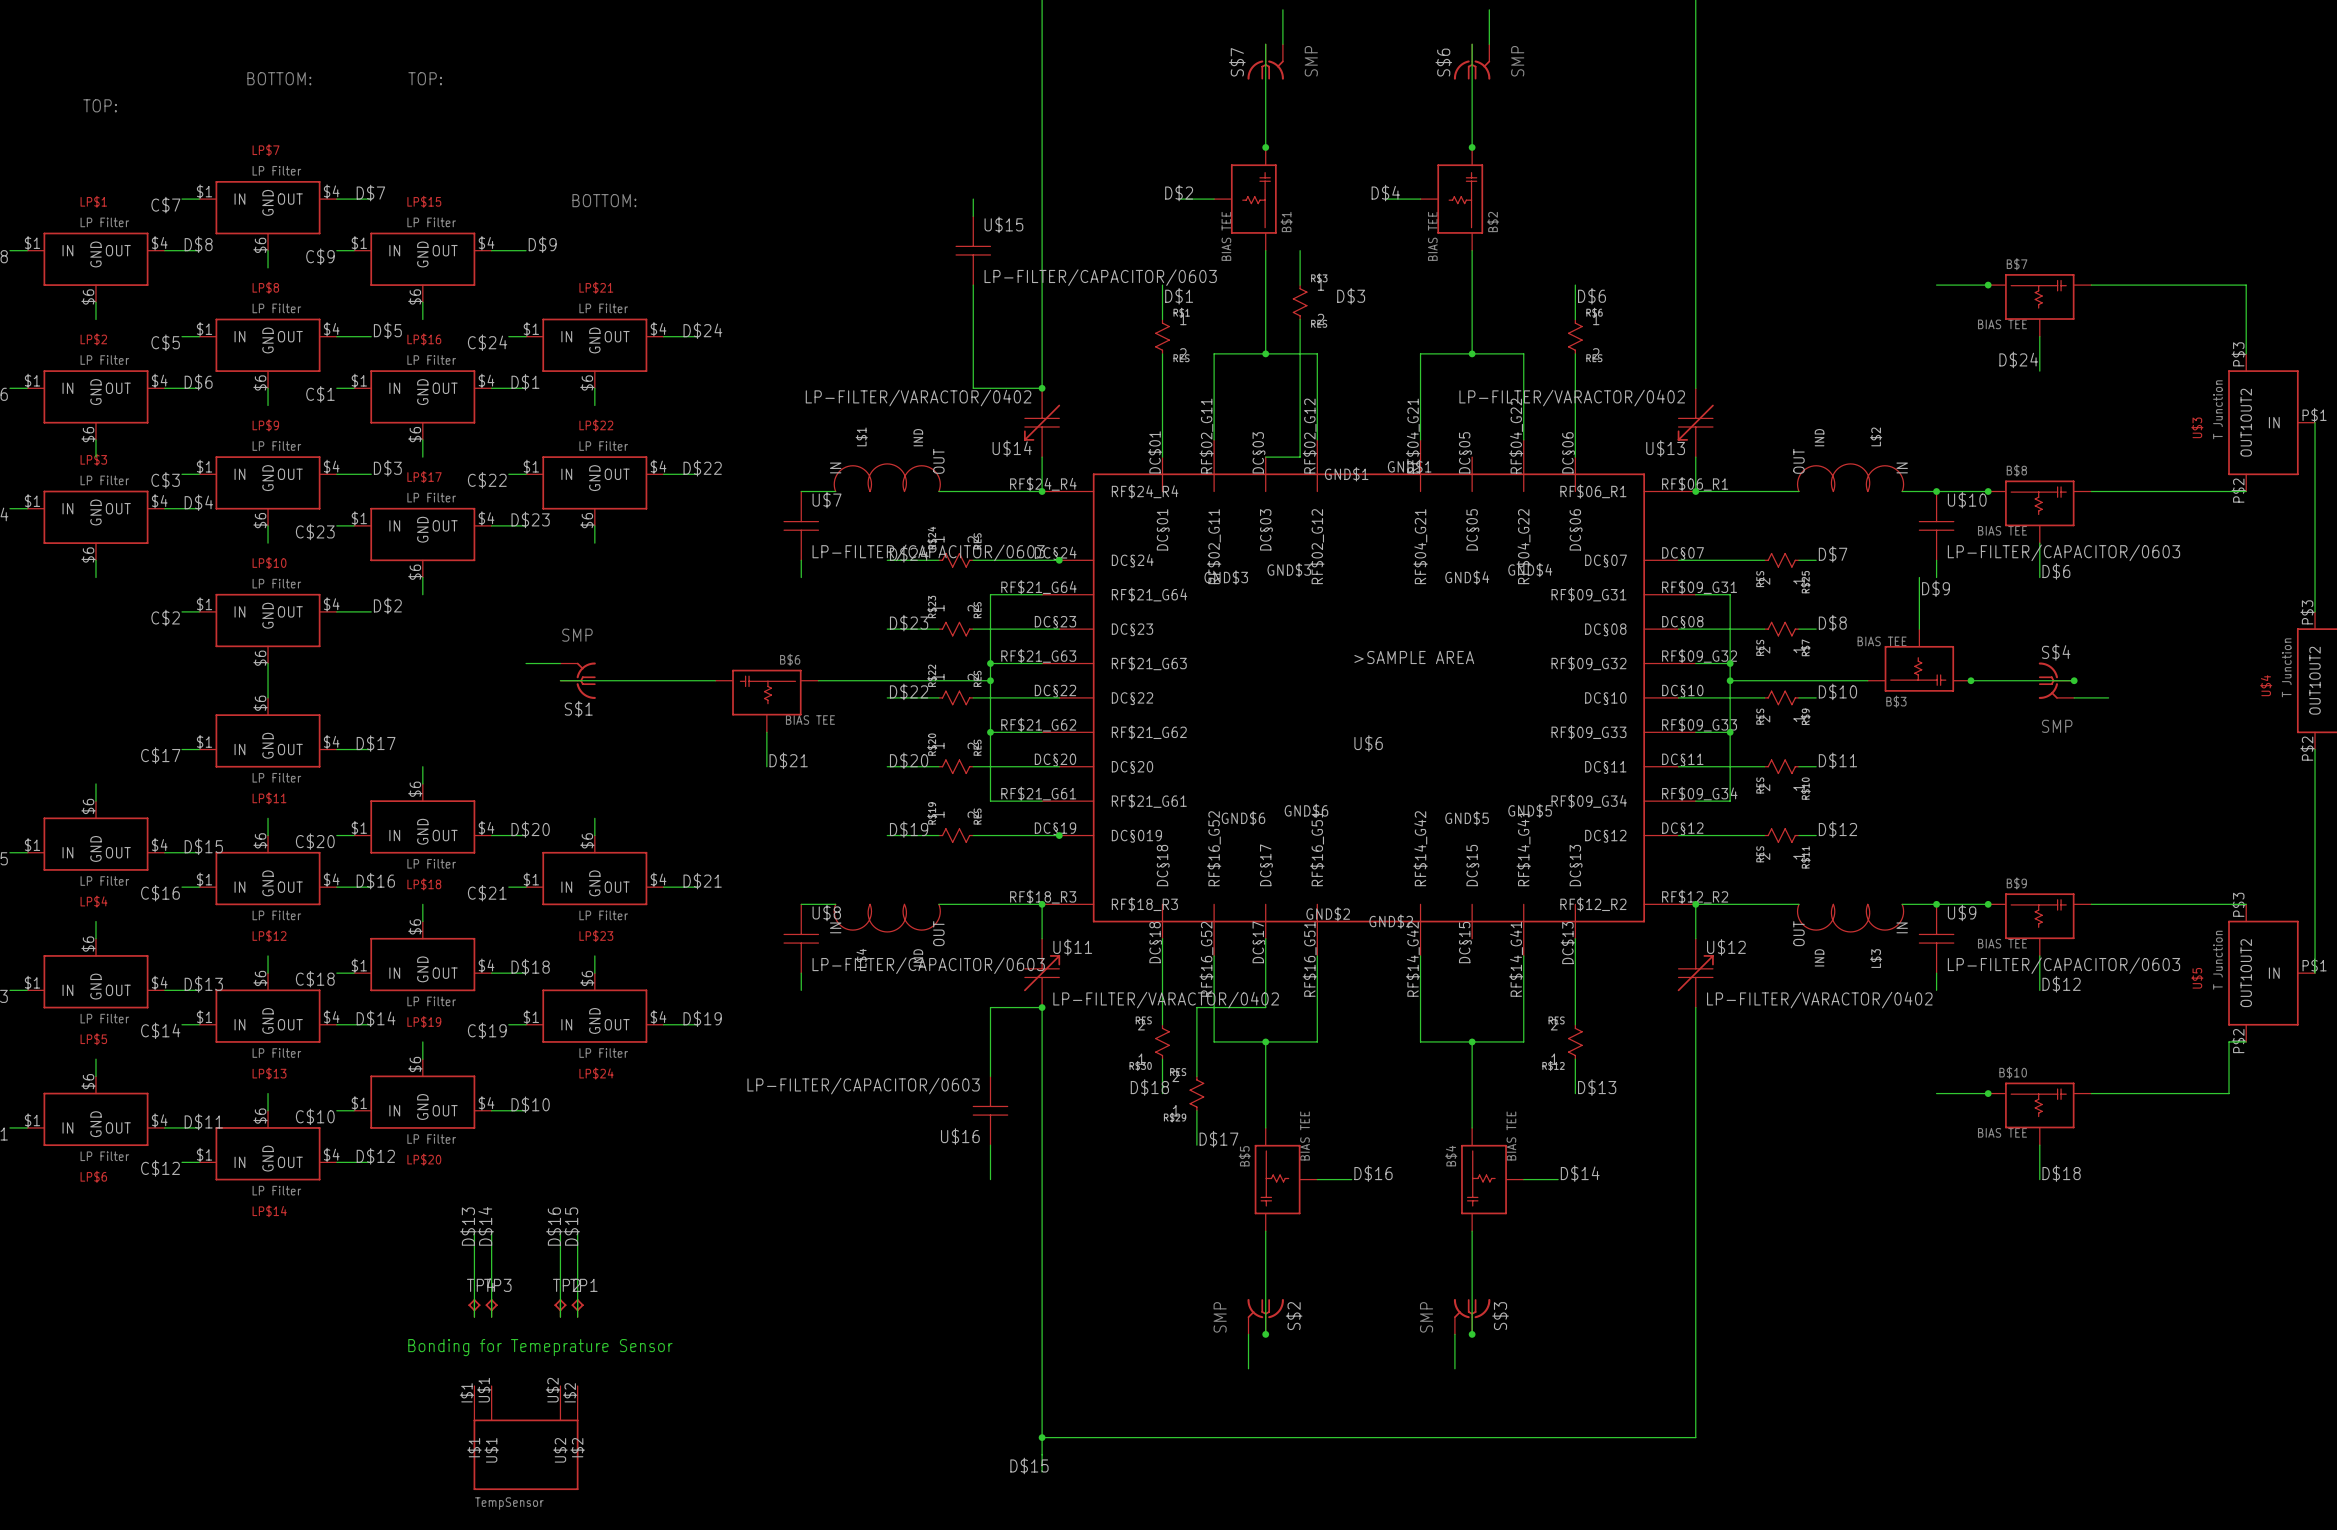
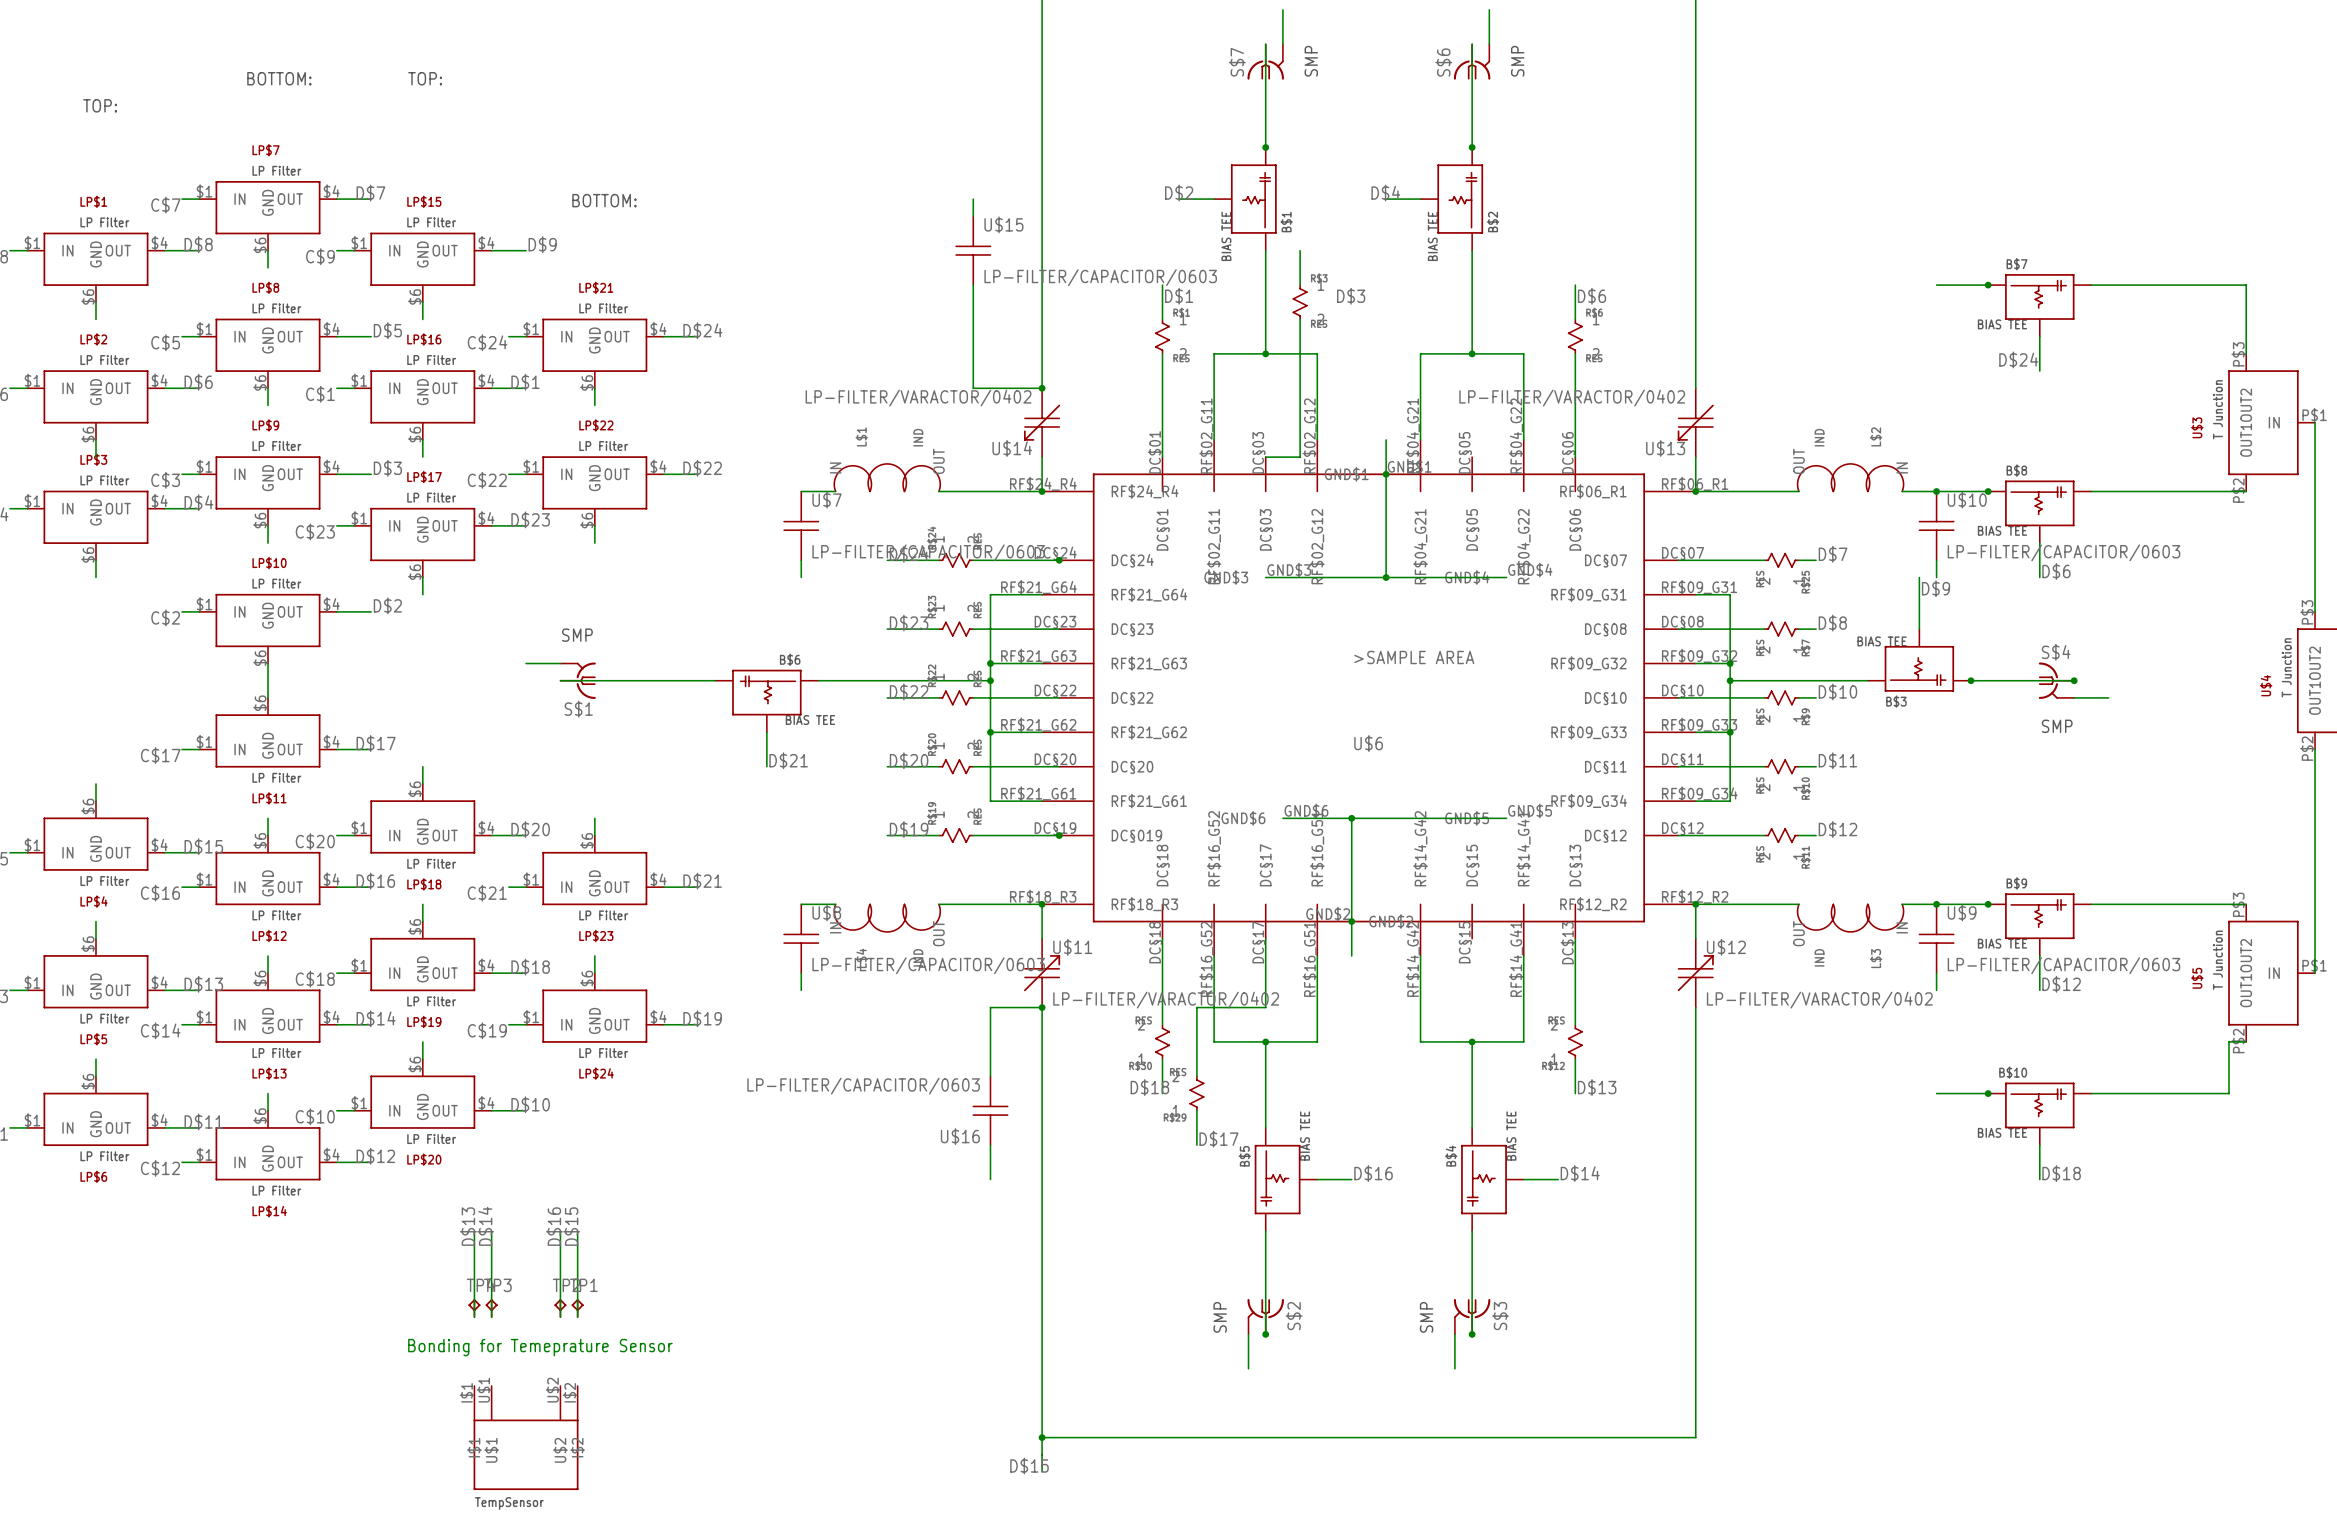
wire: none -> (1386, 439) (1386, 577)
junction: none -> (1386, 474)
wire: none -> (1265, 577) (1506, 577)
junction: none -> (1386, 577)
wire: none -> (1282, 818) (1506, 818)
wire: none -> (1351, 818) (1351, 955)
junction: none -> (1351, 818)
junction: none -> (1351, 921)

